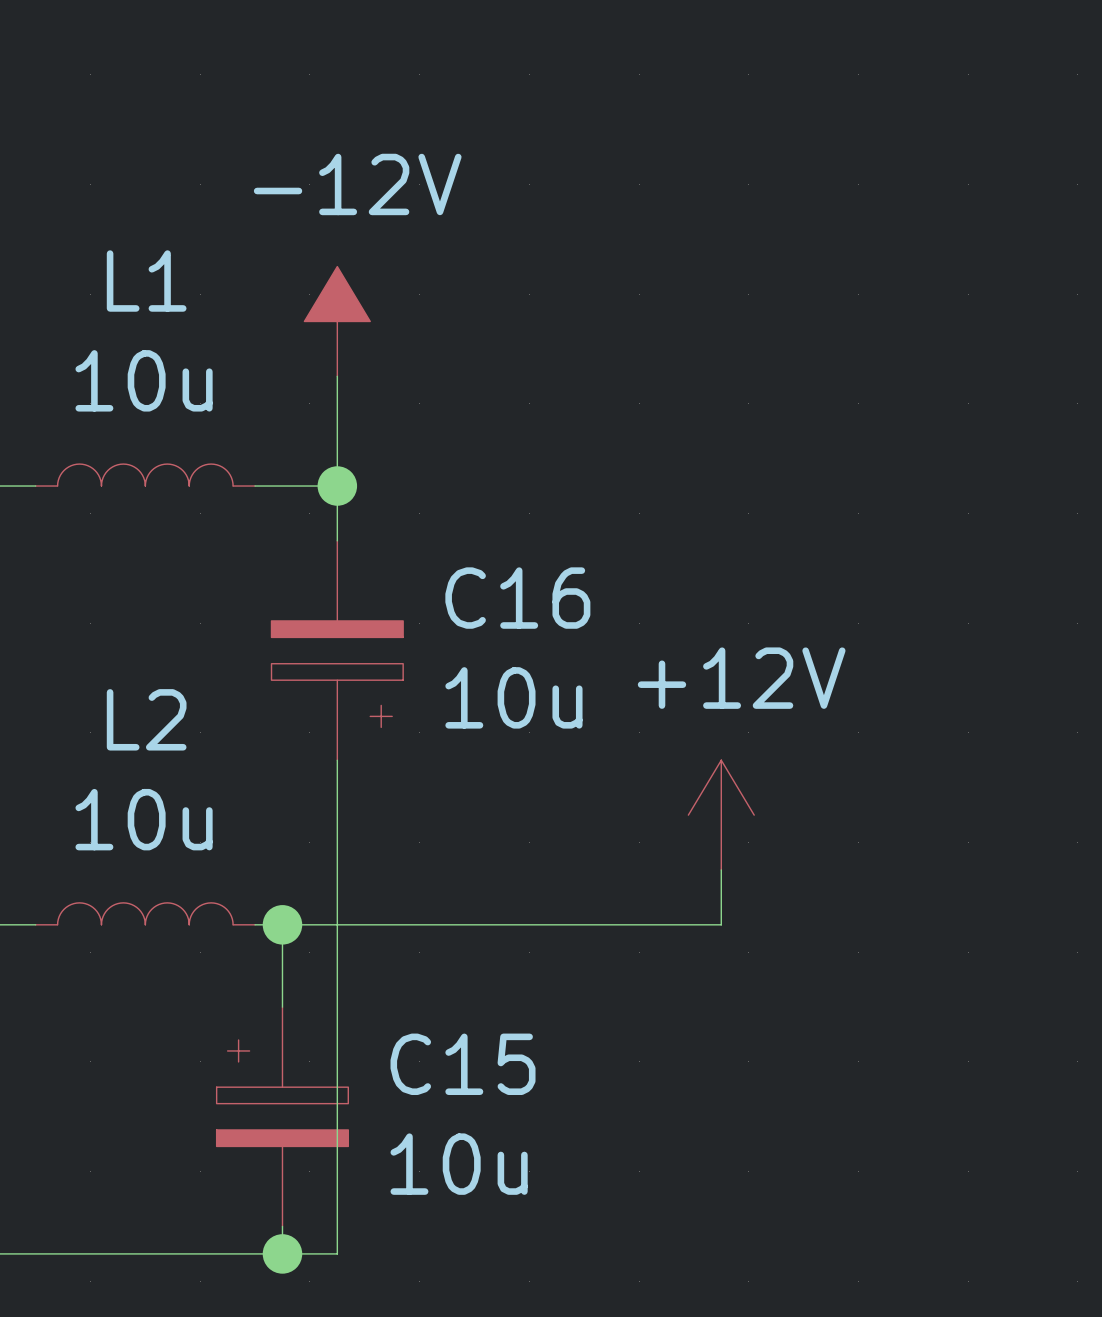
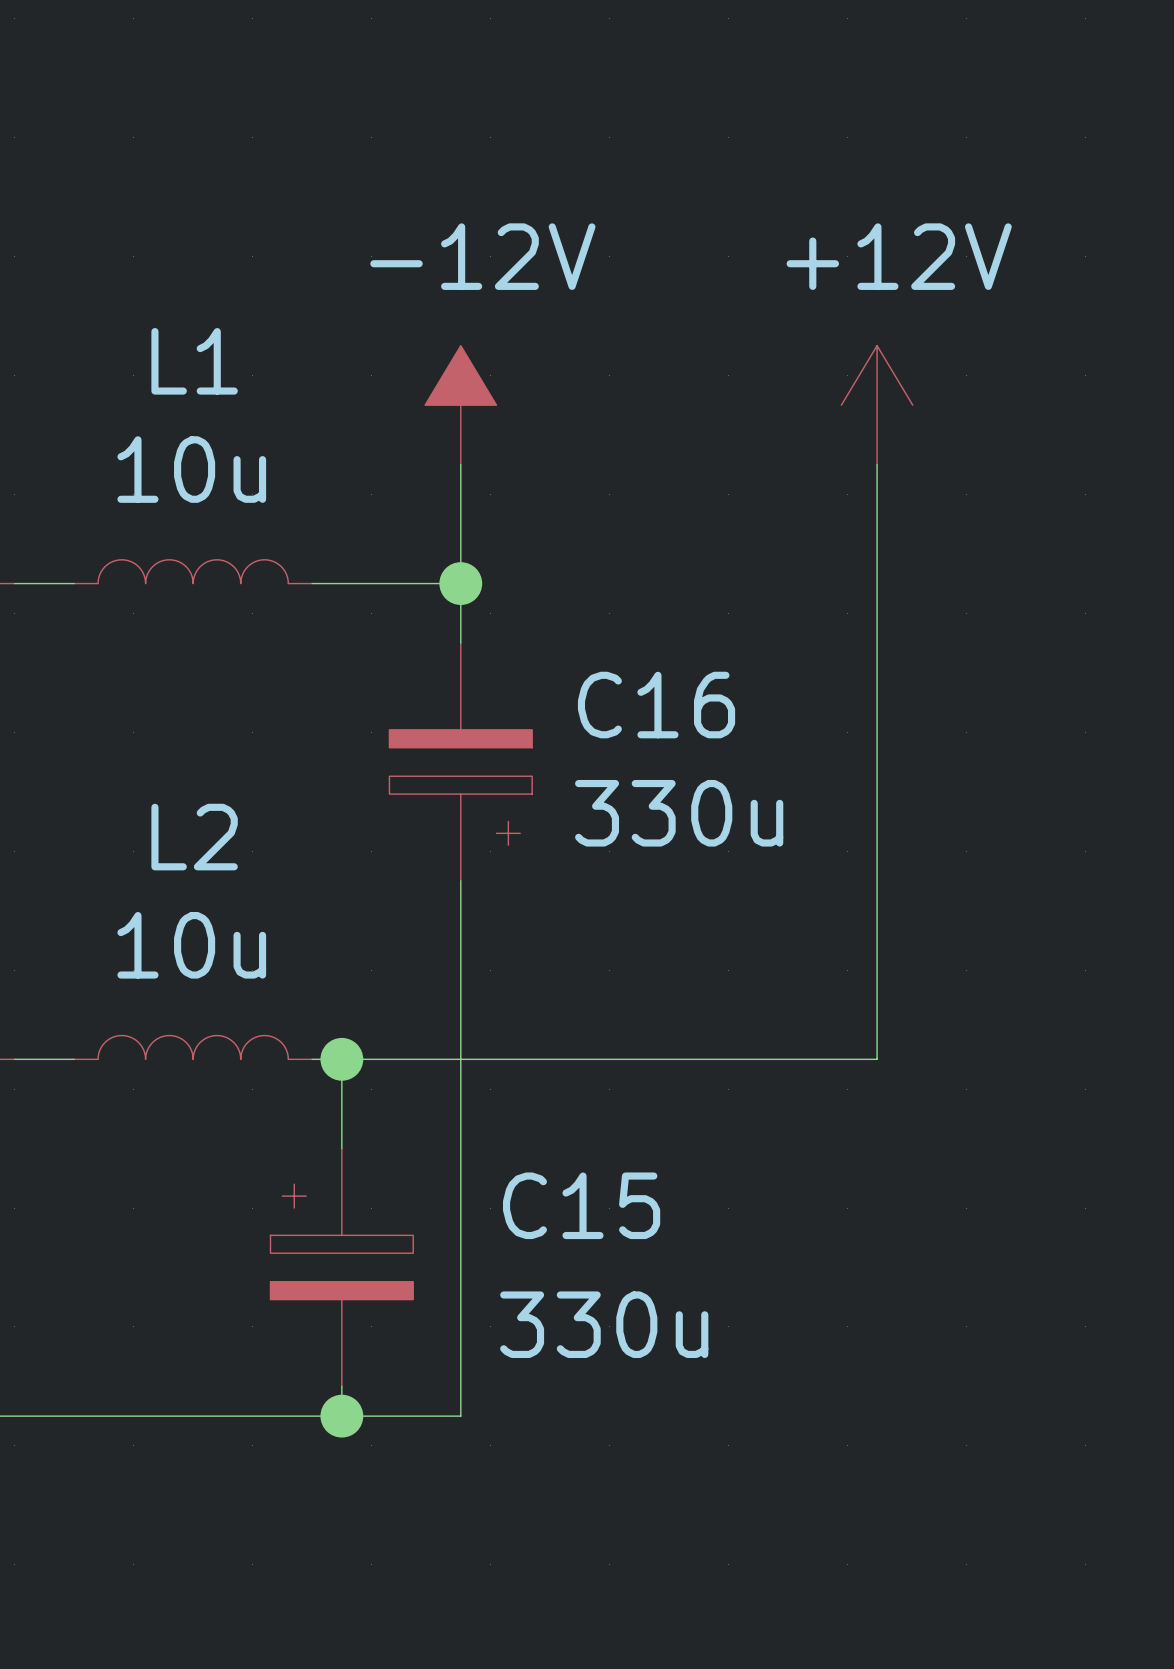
power symbol position: -12V (337, 321) -> -12V (460, 405)
wire: (337, 376) (337, 540) -> (460, 464) (460, 643)
wire: none -> (401, 583) (460, 583)
junction position: (337, 486) -> (460, 583)
C16 position: (337, 650) -> (460, 761)
C16 value: 10u (513, 697) -> 330u (679, 813)
wire: (337, 760) (337, 1253) -> (460, 880) (460, 1416) (401, 1416)
power symbol position: +12V (721, 815) -> +12V (877, 405)
wire: (721, 869) (721, 924) -> (877, 464) (877, 1059) (817, 1059)
C15 name position: C15 (463, 1064) -> C15 (581, 1205)
C15 value: 10u (459, 1164) -> 330u (604, 1324)

